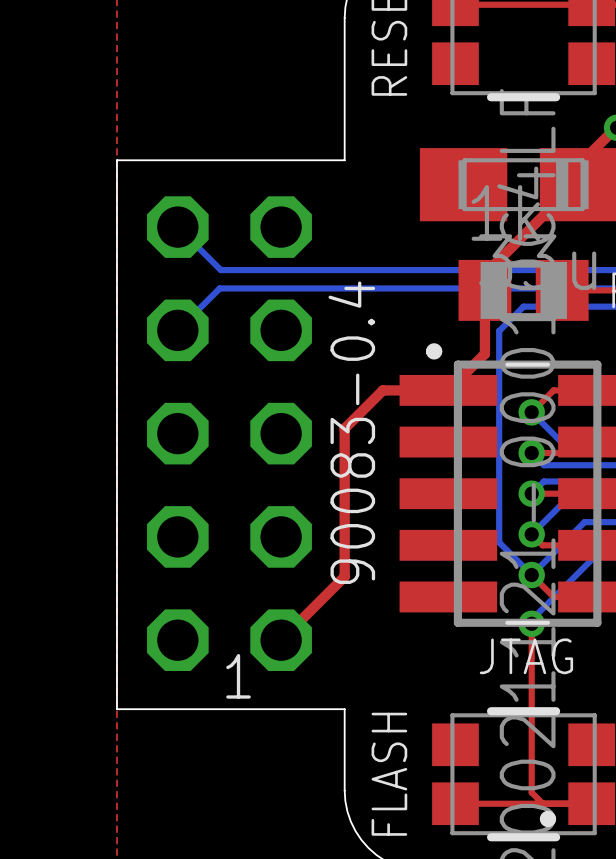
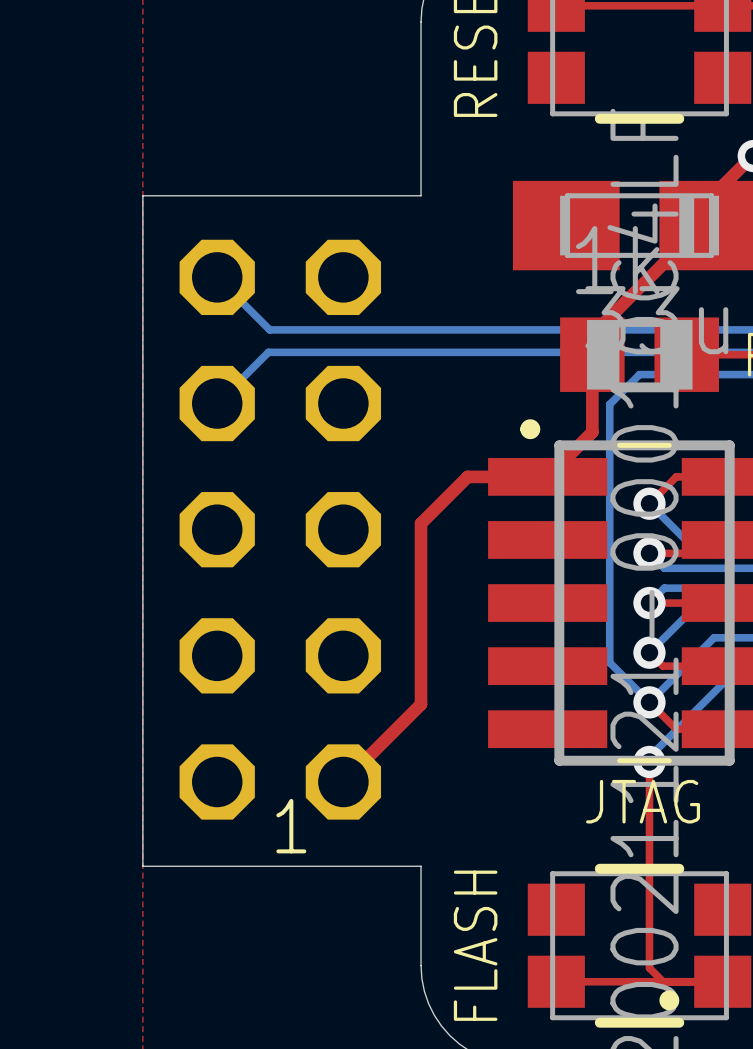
text: 90083-0.4 (351, 432) -> none

